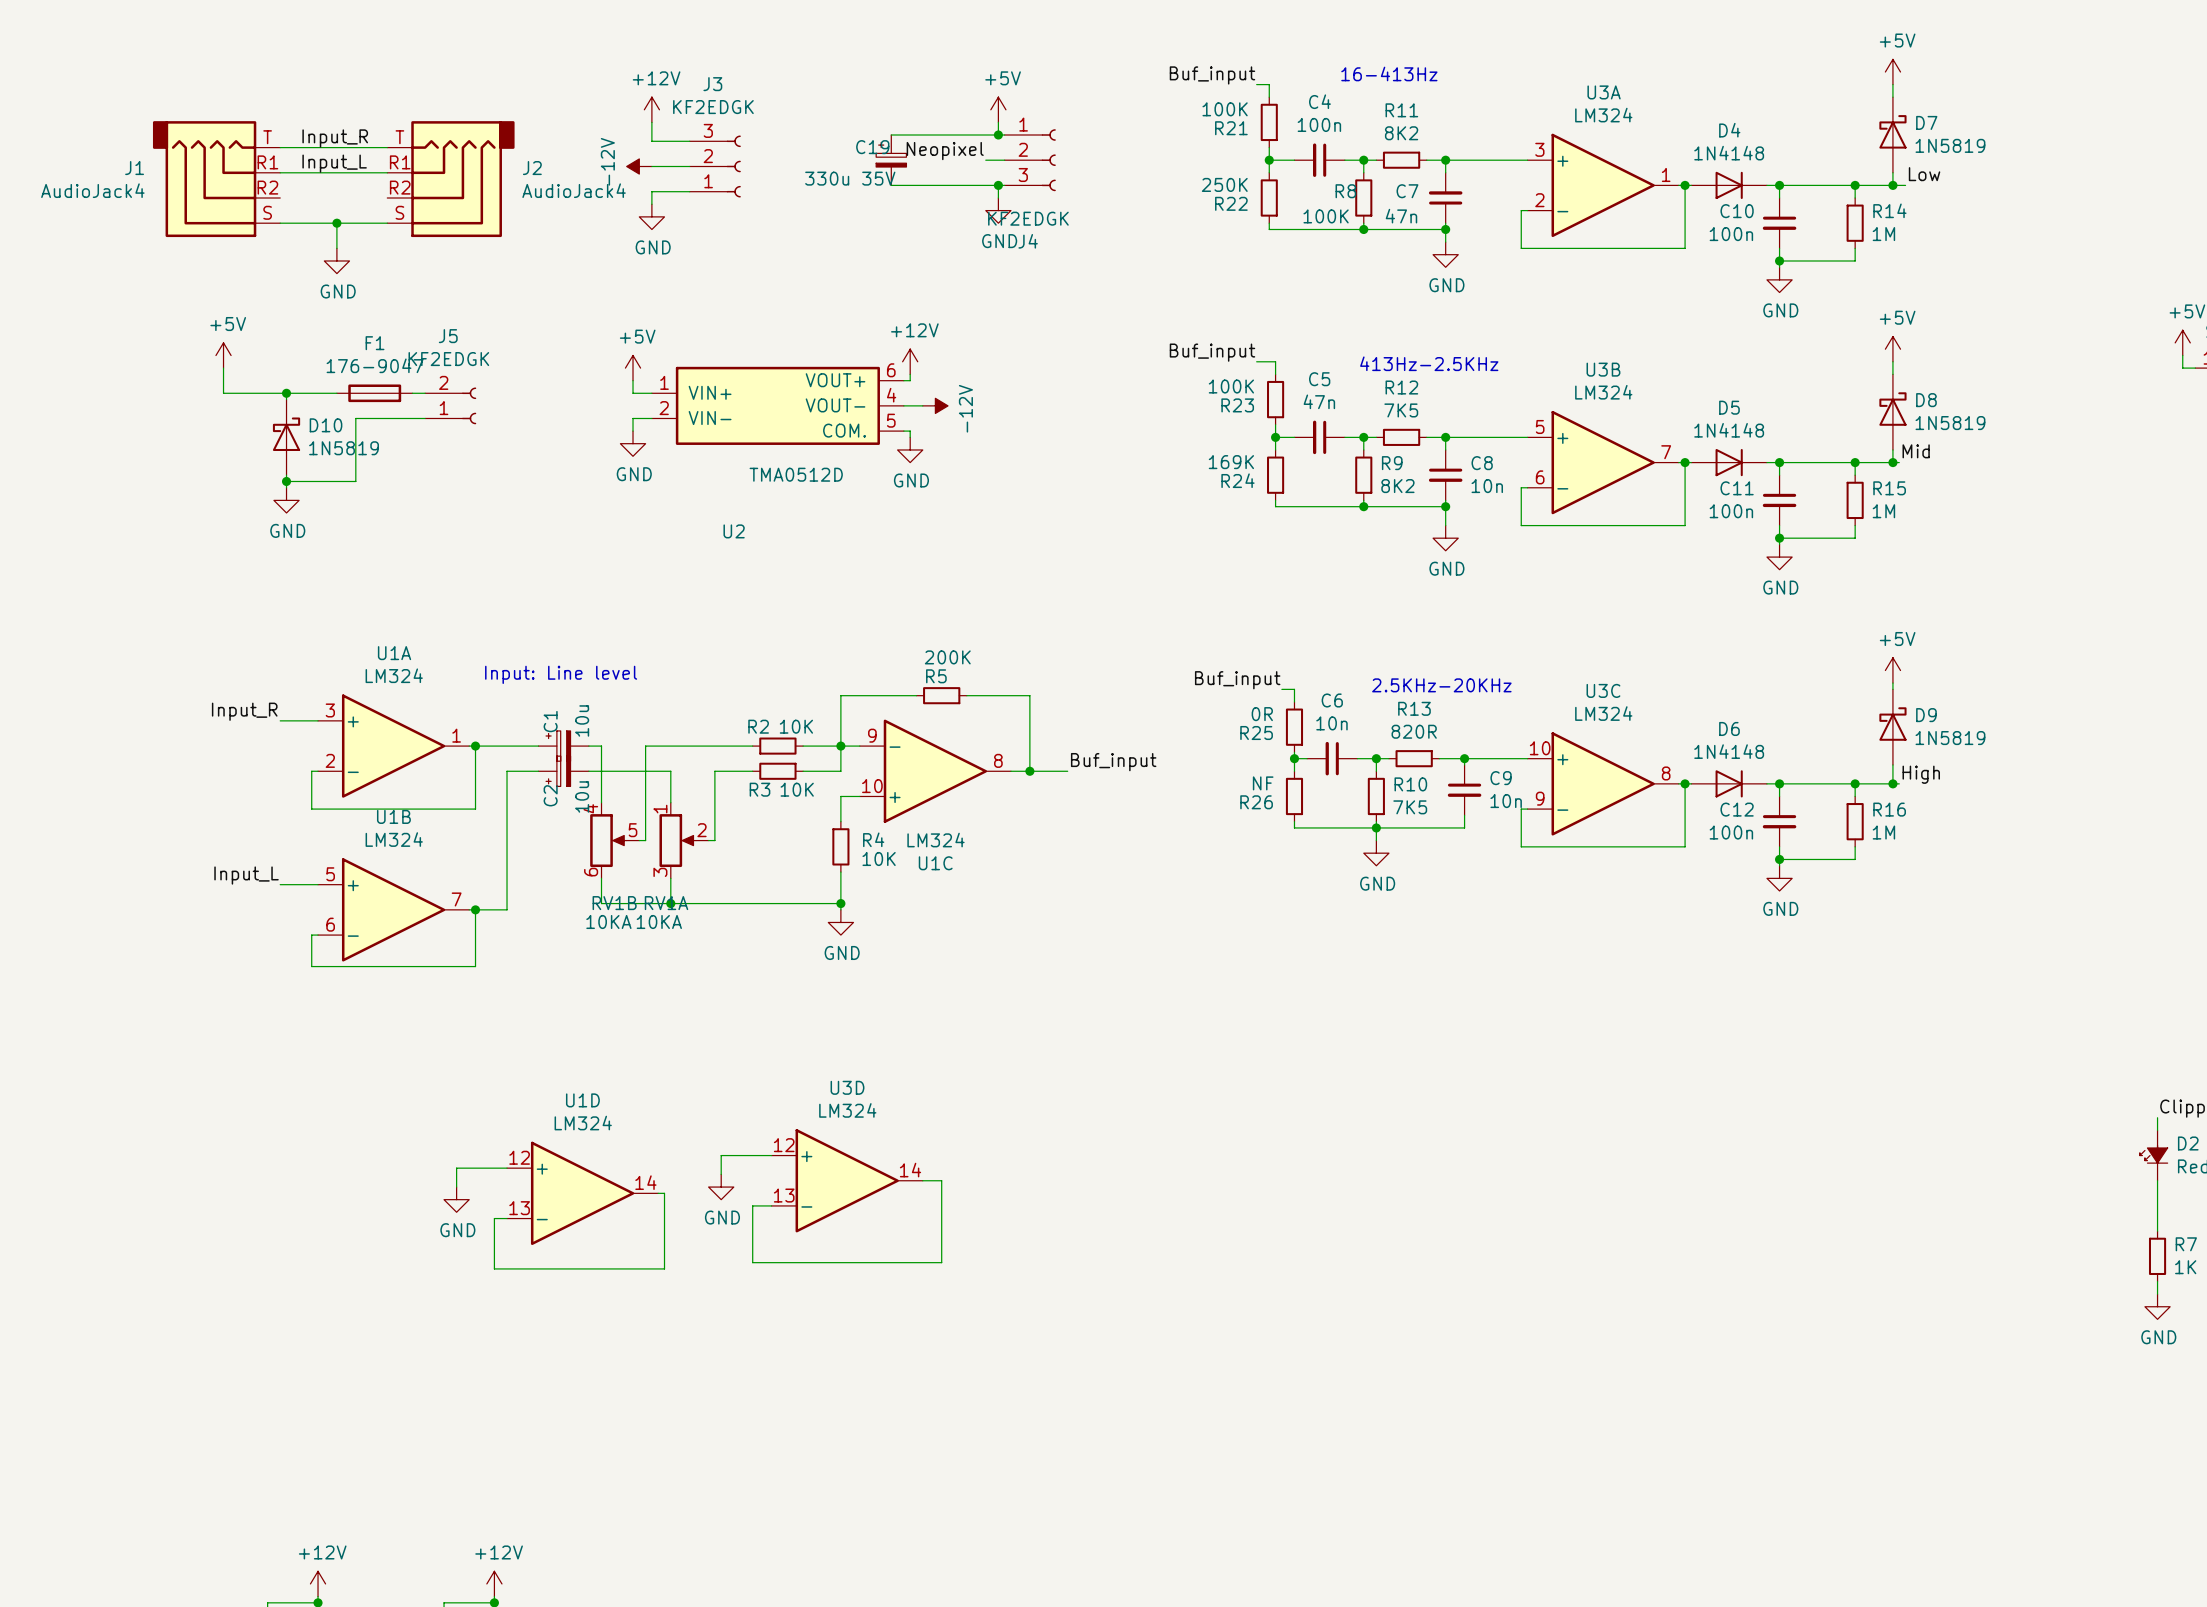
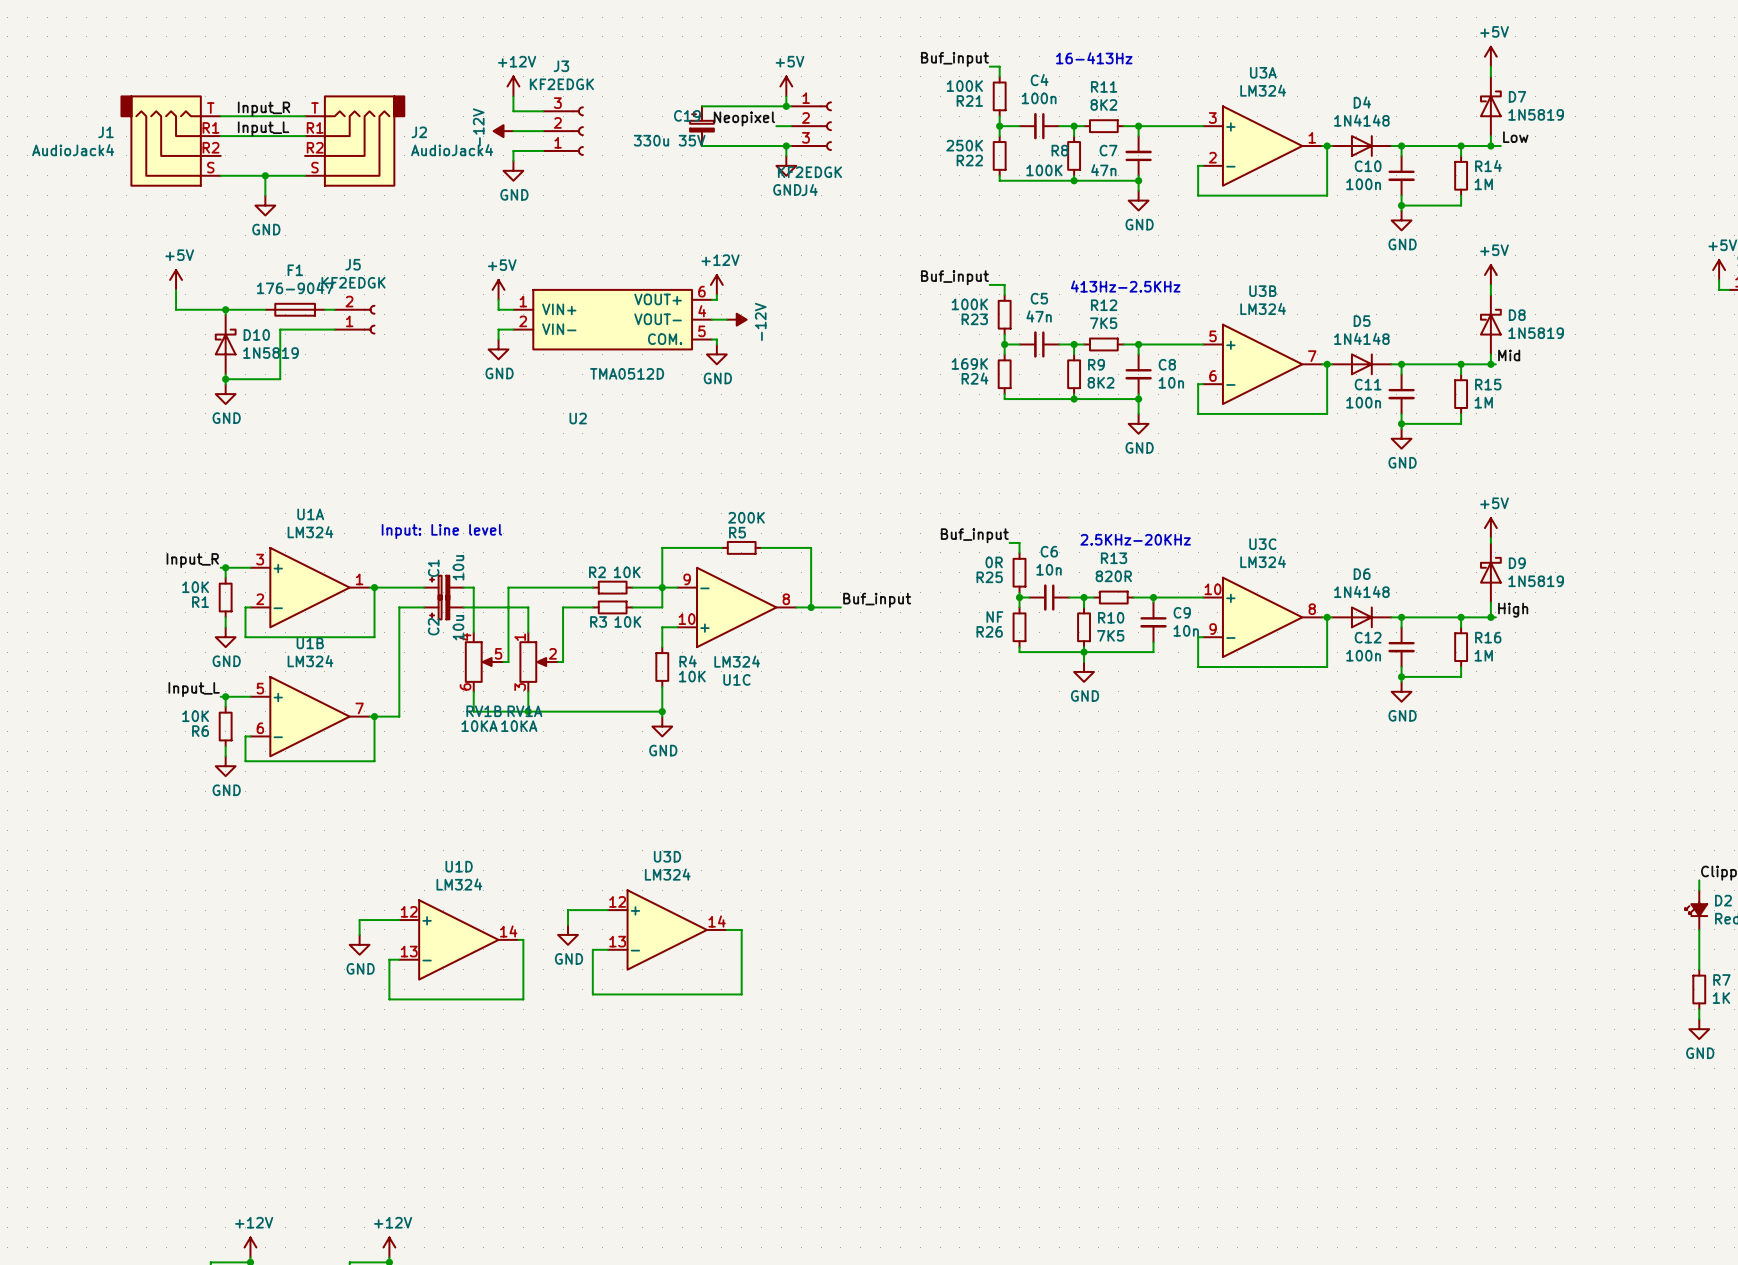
wire: none -> (225, 567) (225, 577)
junction: none -> (225, 567)
R1: none -> 10K (225, 597)
wire: none -> (225, 617) (225, 627)
power symbol: none -> GND (225, 637)
wire: none -> (225, 696) (225, 706)
junction: none -> (225, 696)
R6: none -> 10K (225, 726)
wire: none -> (225, 746) (225, 756)
power symbol: none -> GND (225, 766)

